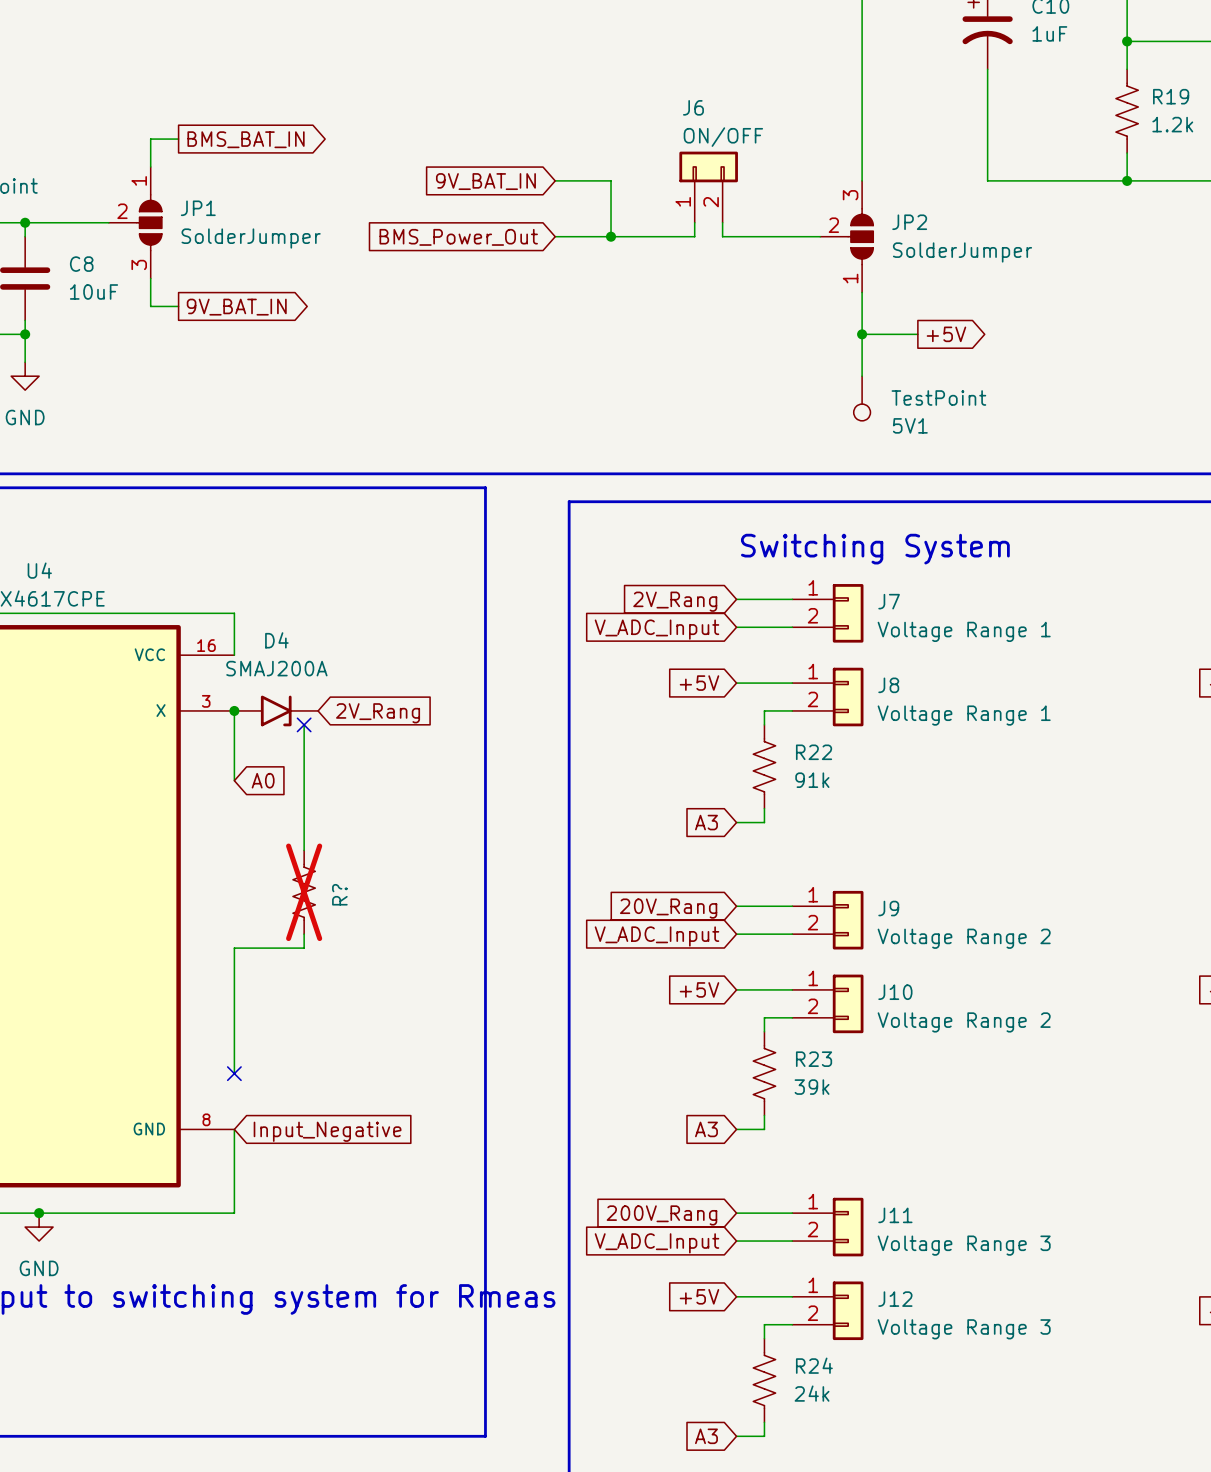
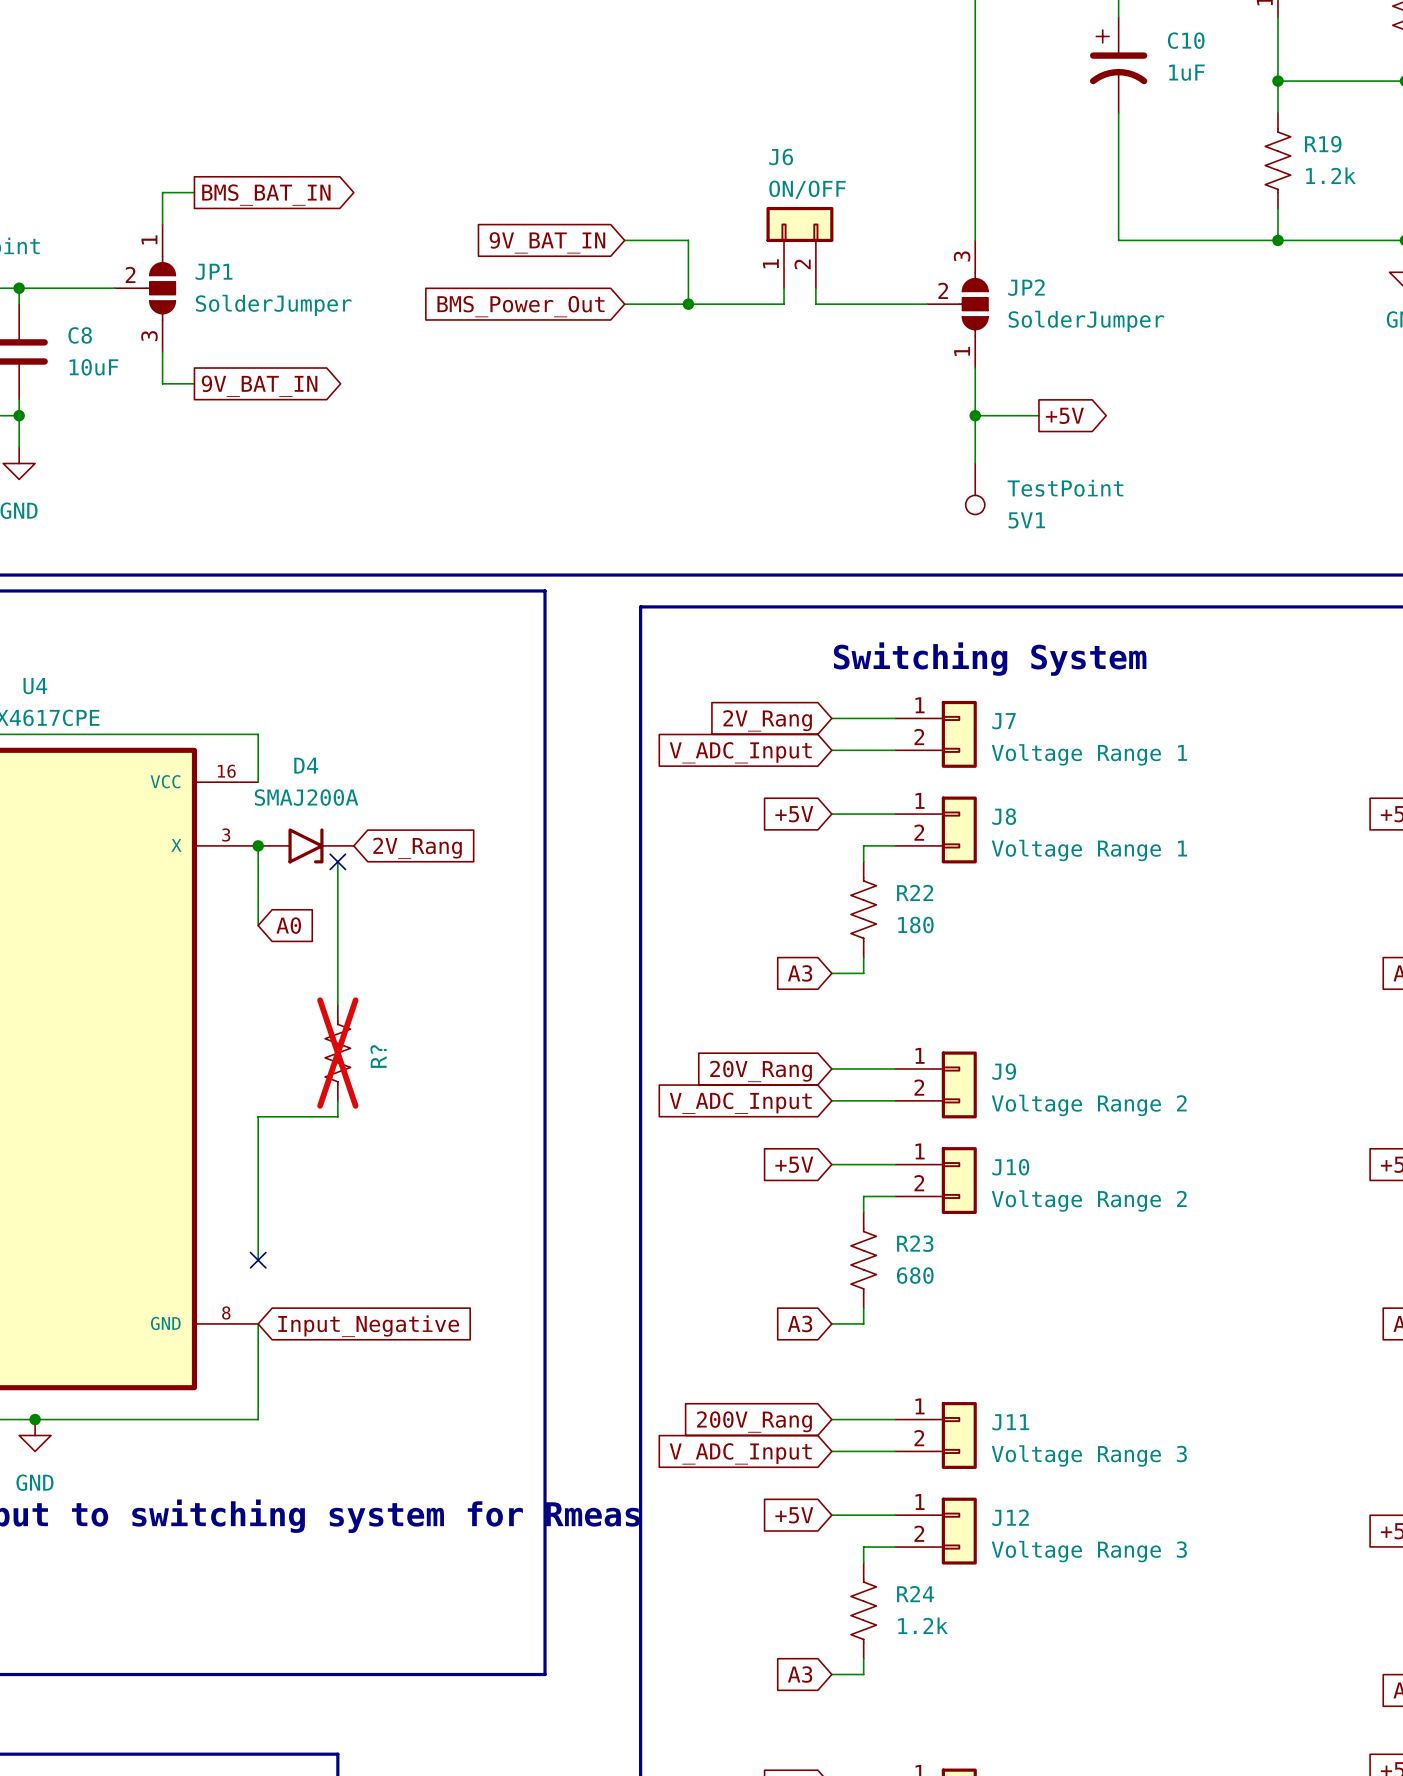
R22 value: 91k (812, 780) -> 180 (915, 925)
R23 value: 39k (812, 1087) -> 680 (915, 1275)
R24 value: 24k (812, 1393) -> 1.2k (923, 1625)

